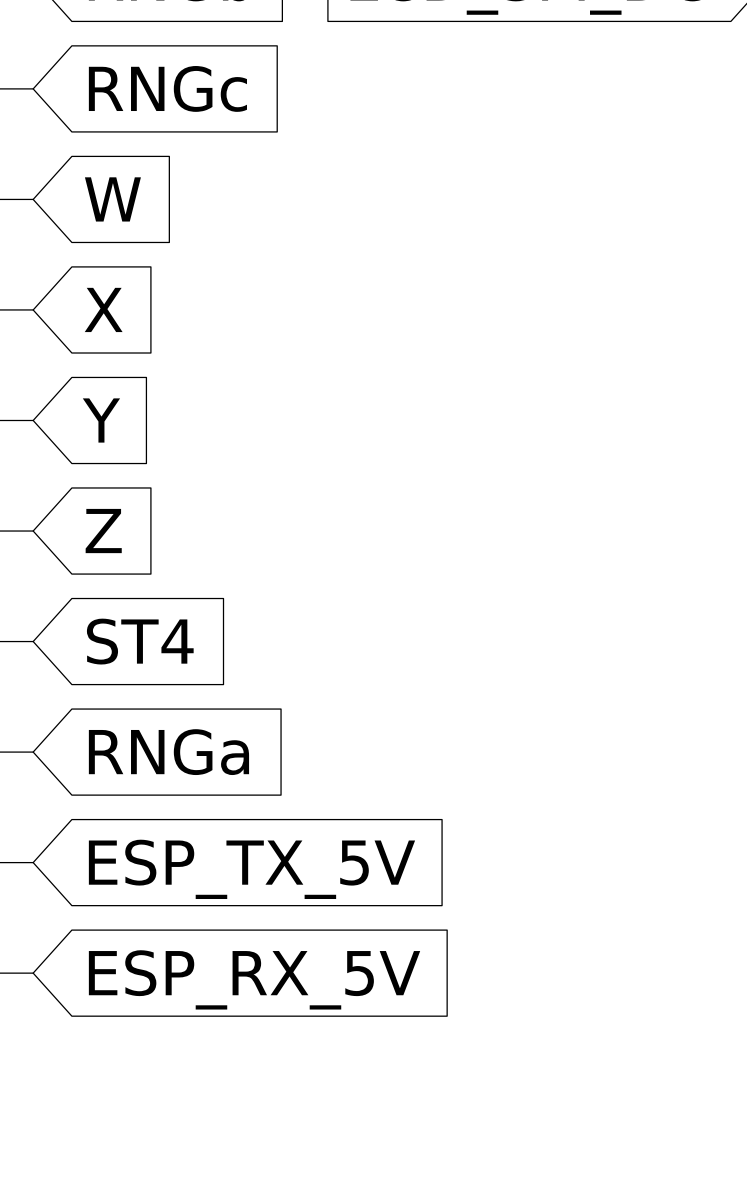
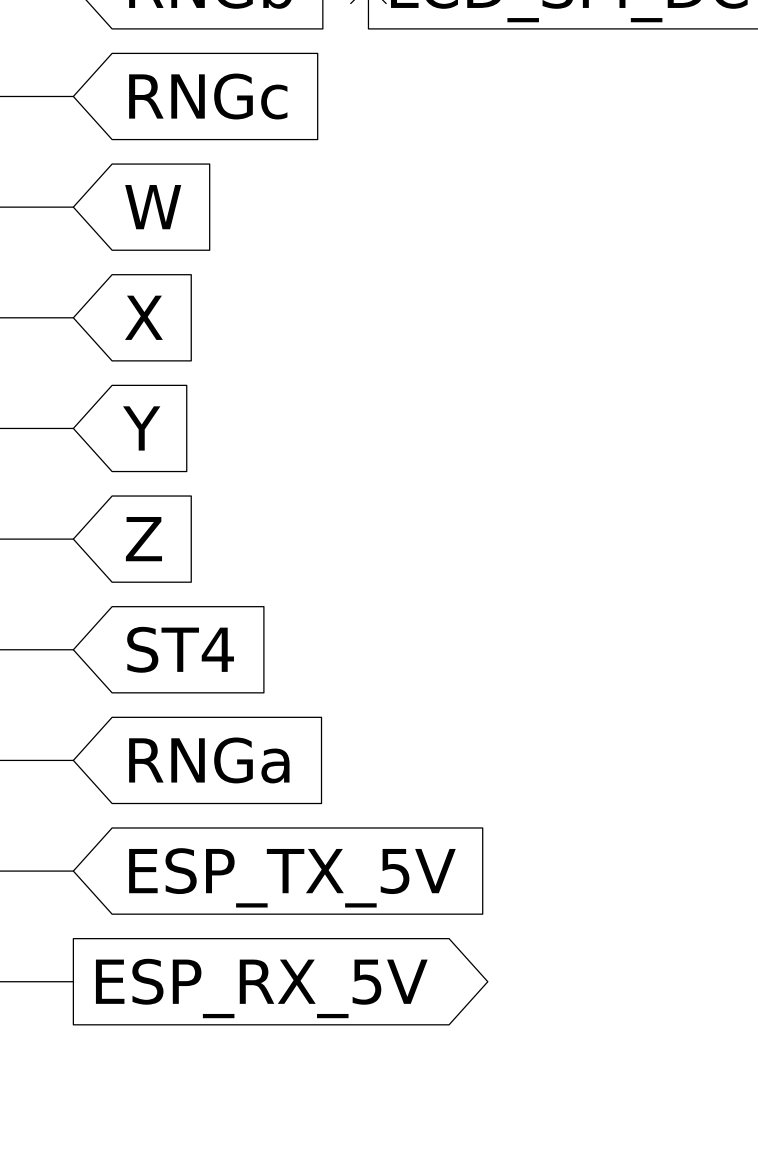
global label shape: input (254, 979) -> output (261, 988)

